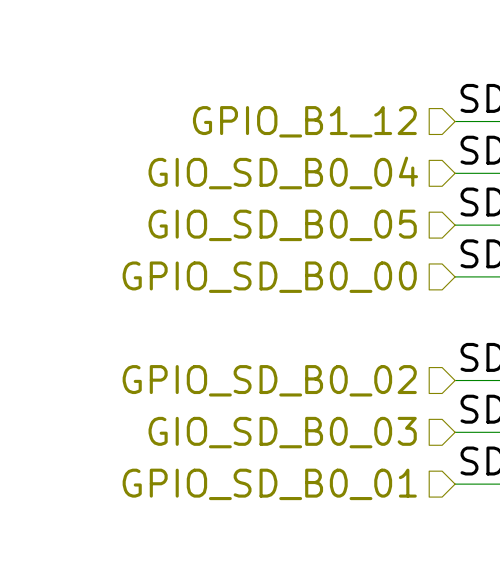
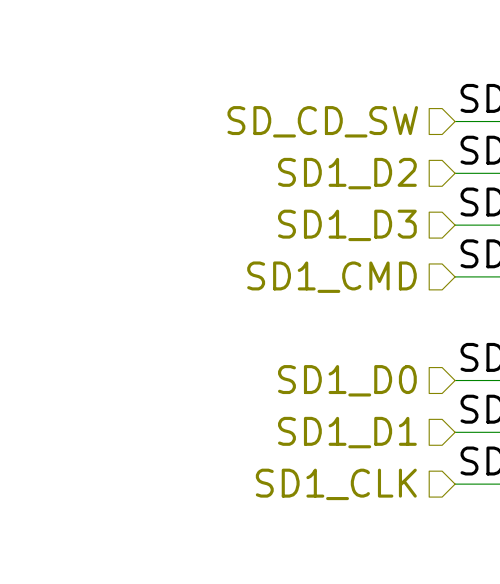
hierarchical label: GPIO_B1_12 (304, 121) -> SD_CD_SW (322, 121)
hierarchical label: GIO_SD_B0_04 (283, 172) -> SD1_D2 (347, 173)
hierarchical label: GIO_SD_B0_05 (282, 225) -> SD1_D3 (347, 225)
hierarchical label: GPIO_SD_B0_00 (269, 277) -> SD1_CMD (331, 277)
hierarchical label: GPIO_SD_B0_02 (269, 380) -> SD1_D0 (347, 380)
hierarchical label: GIO_SD_B0_03 (282, 432) -> SD1_D1 (347, 432)
hierarchical label: GPIO_SD_B0_01 (269, 484) -> SD1_CLK (336, 484)

